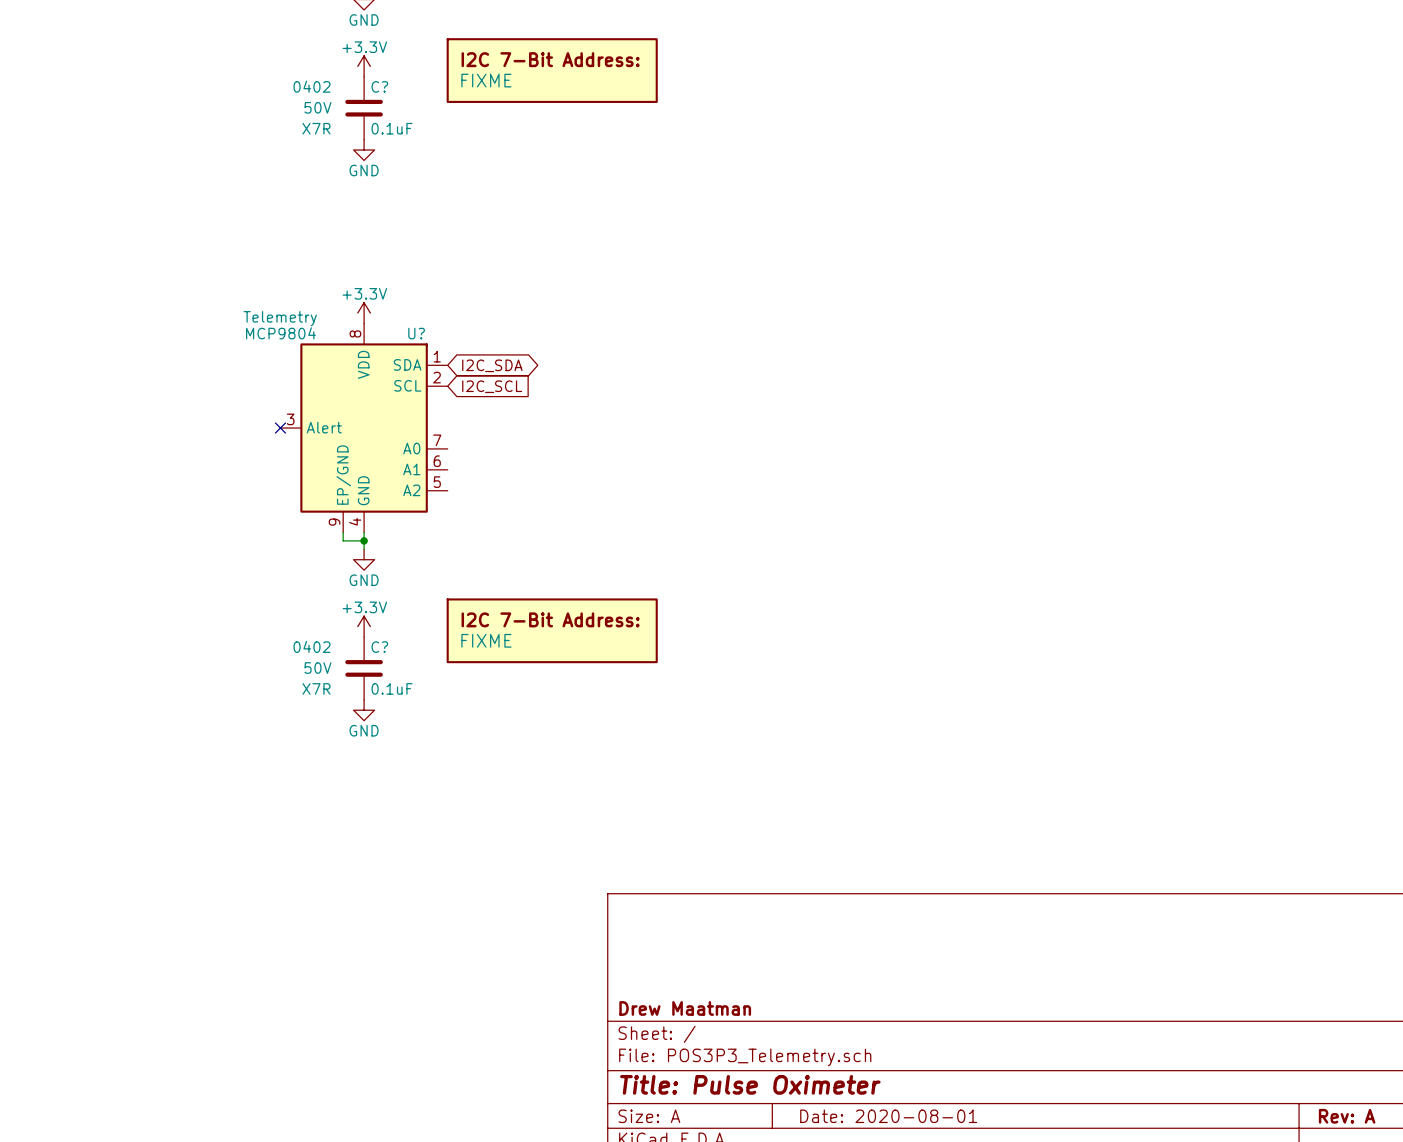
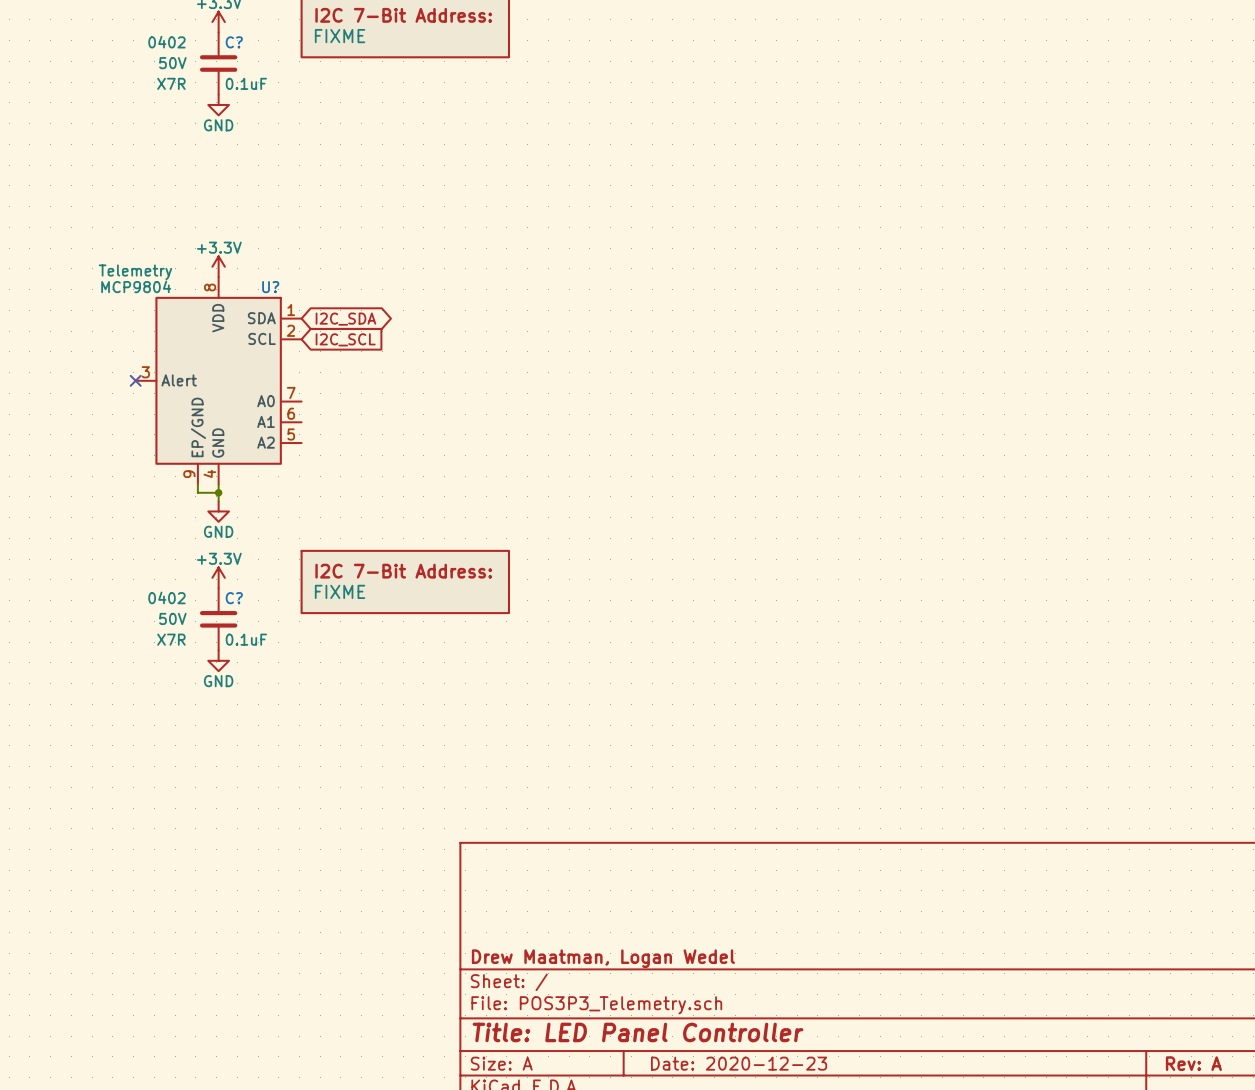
title block: Drew Maatman (685, 1008) -> Drew Maatman, Logan Wedel (603, 958)
title block: Title: Pulse Oximeter (750, 1084) -> Title: LED Panel Controller (638, 1032)
title block: Date: 2020-08-01 (888, 1116) -> Date: 2020-12-23 (739, 1063)

